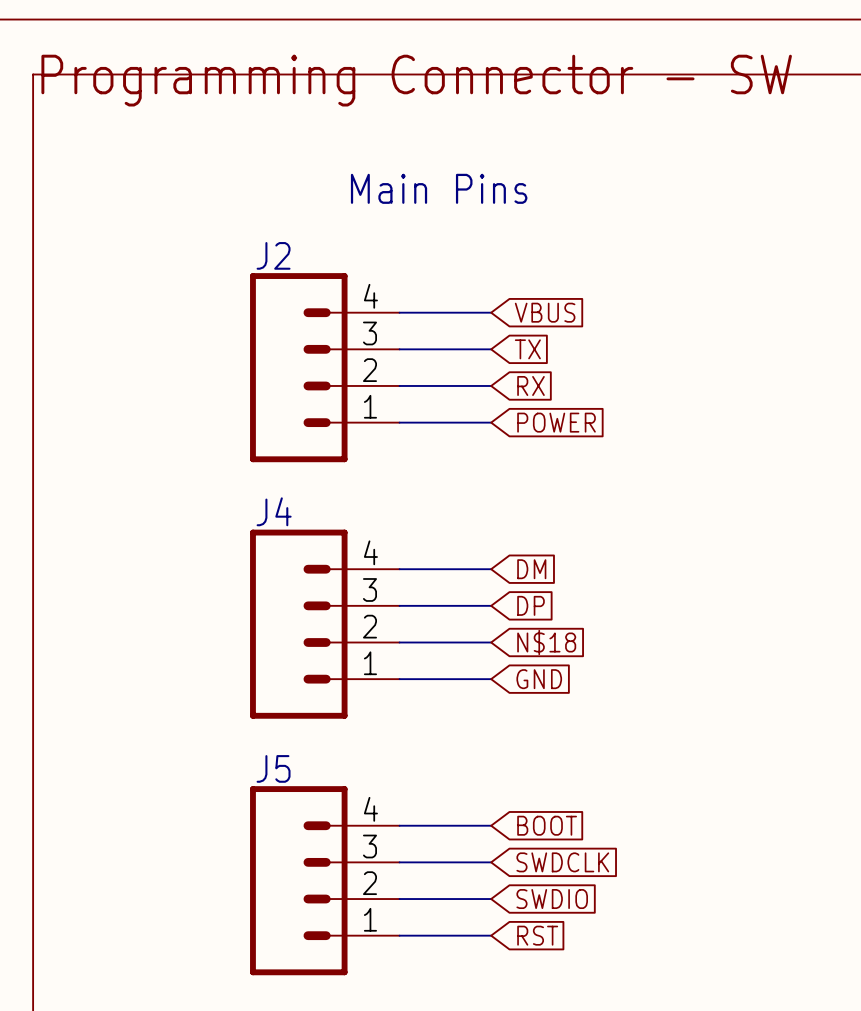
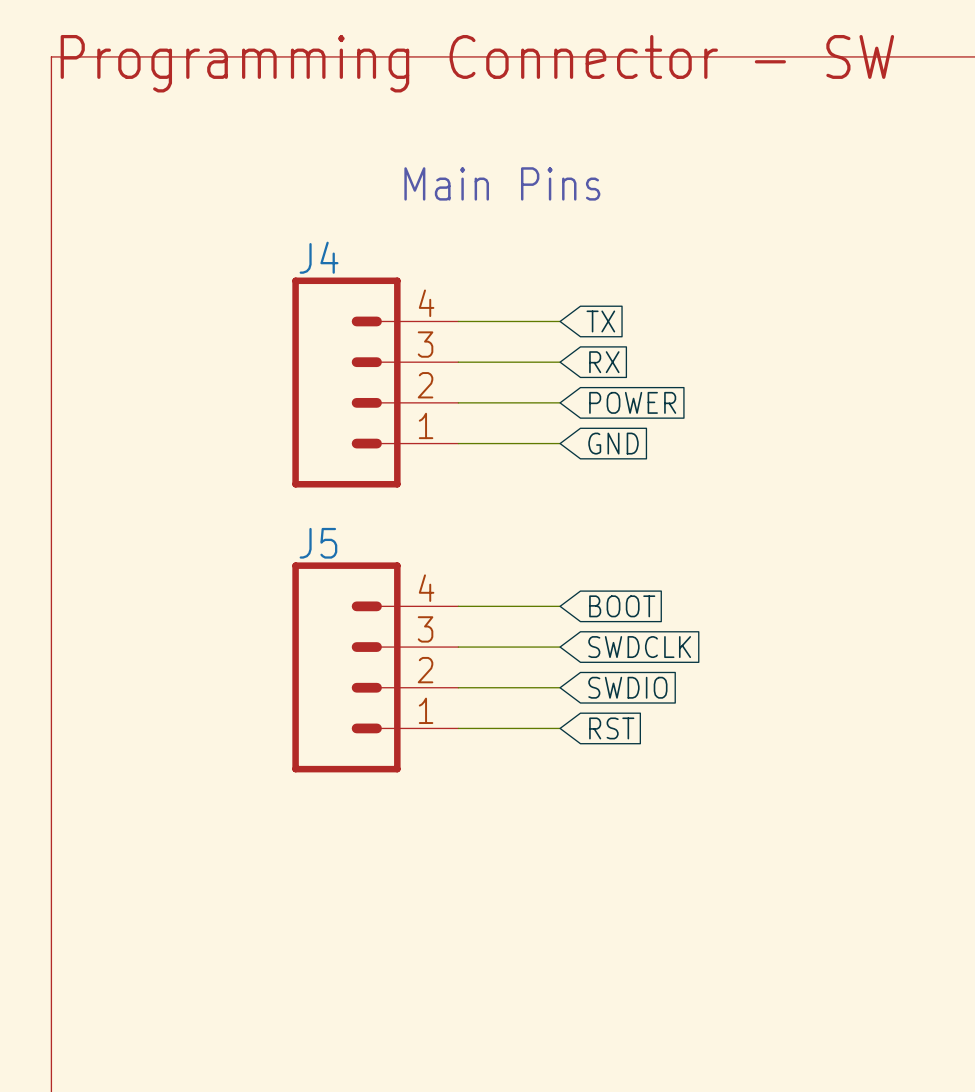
J2 name: J2 (273, 255) -> J4 (319, 257)
global label: VBUS (545, 312) -> TX (600, 321)
global label: TX (527, 349) -> RX (604, 362)
global label: RX (531, 385) -> POWER (632, 402)
global label: POWER (556, 422) -> GND (613, 443)
J4 name: J4 (274, 511) -> J5 (318, 543)
global label: DM (531, 569) -> BOOT (622, 606)
global label: DP (531, 605) -> SWDCLK (639, 647)
global label: N$18 (546, 642) -> SWDIO (627, 687)
global label: GND (539, 679) -> RST (611, 728)
wire: (399, 825) (491, 825) -> none
global label: BOOT (547, 825) -> none
wire: (399, 862) (491, 862) -> none
global label: SWDCLK (562, 862) -> none
J5: (324, 880) -> none
wire: (399, 899) (491, 899) -> none
global label: SWDIO (552, 899) -> none
wire: (399, 935) (491, 935) -> none
global label: RST (537, 935) -> none

